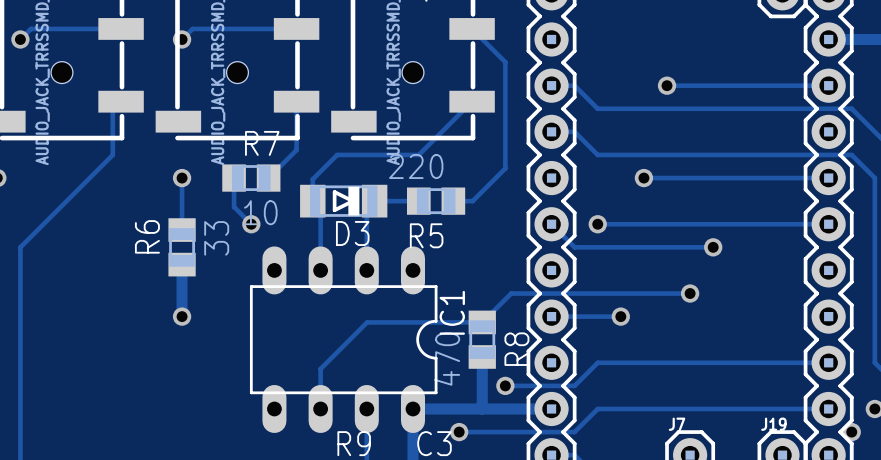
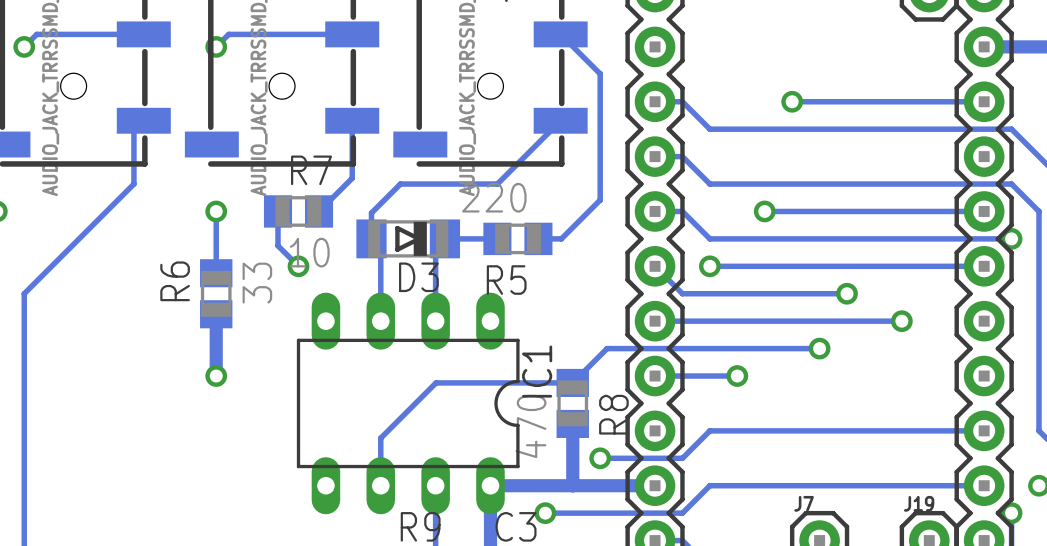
track: none -> (655, 211) (682, 211) (709, 238) (1011, 238)
via: none -> (1011, 238)
track: none -> (901, 321) (655, 321)
via: none -> (901, 321)

